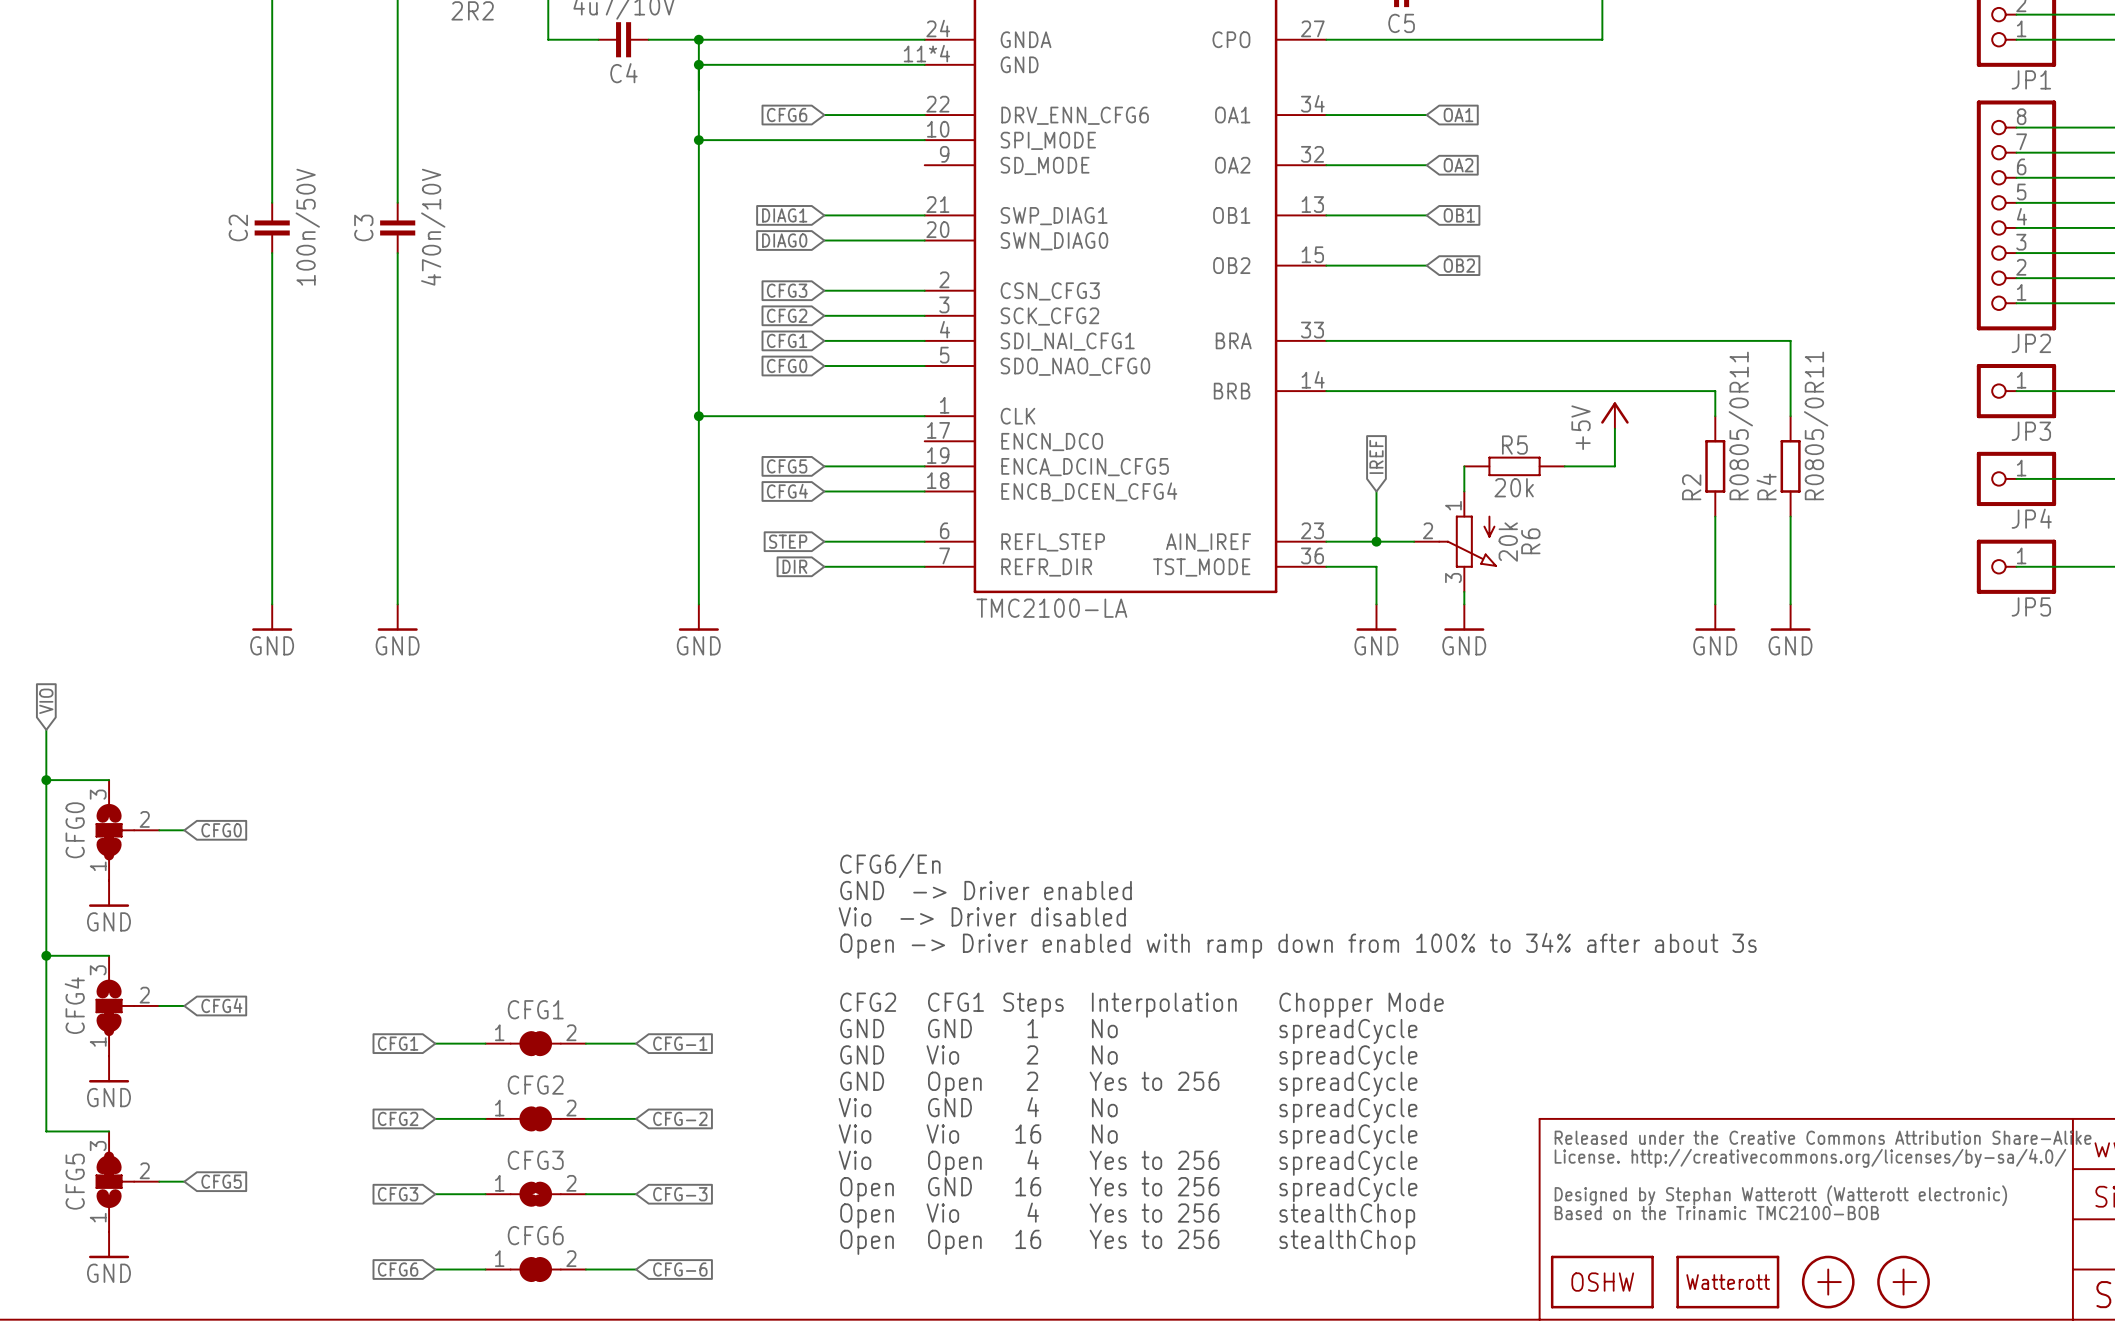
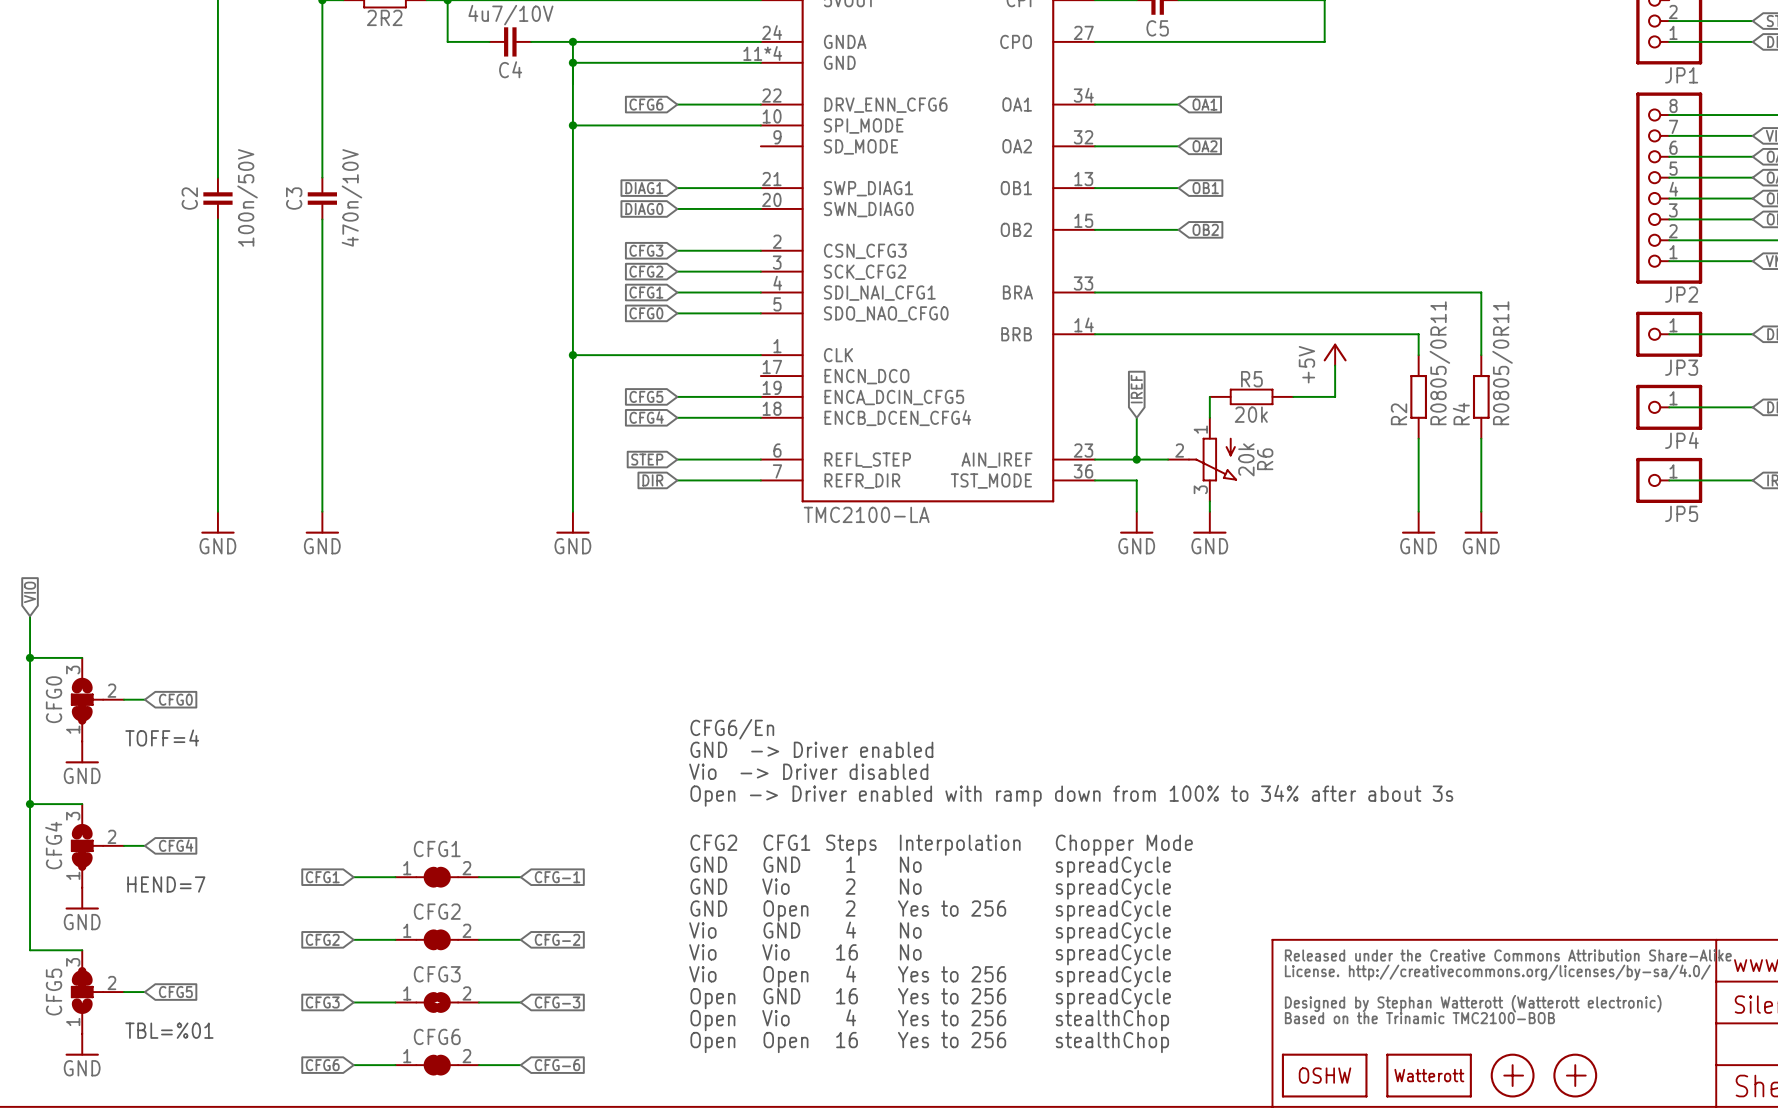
text: none -> TOFF=4 (162, 737)
text: none -> HEND=7 (166, 884)
text: none -> TBL=%01 (169, 1030)

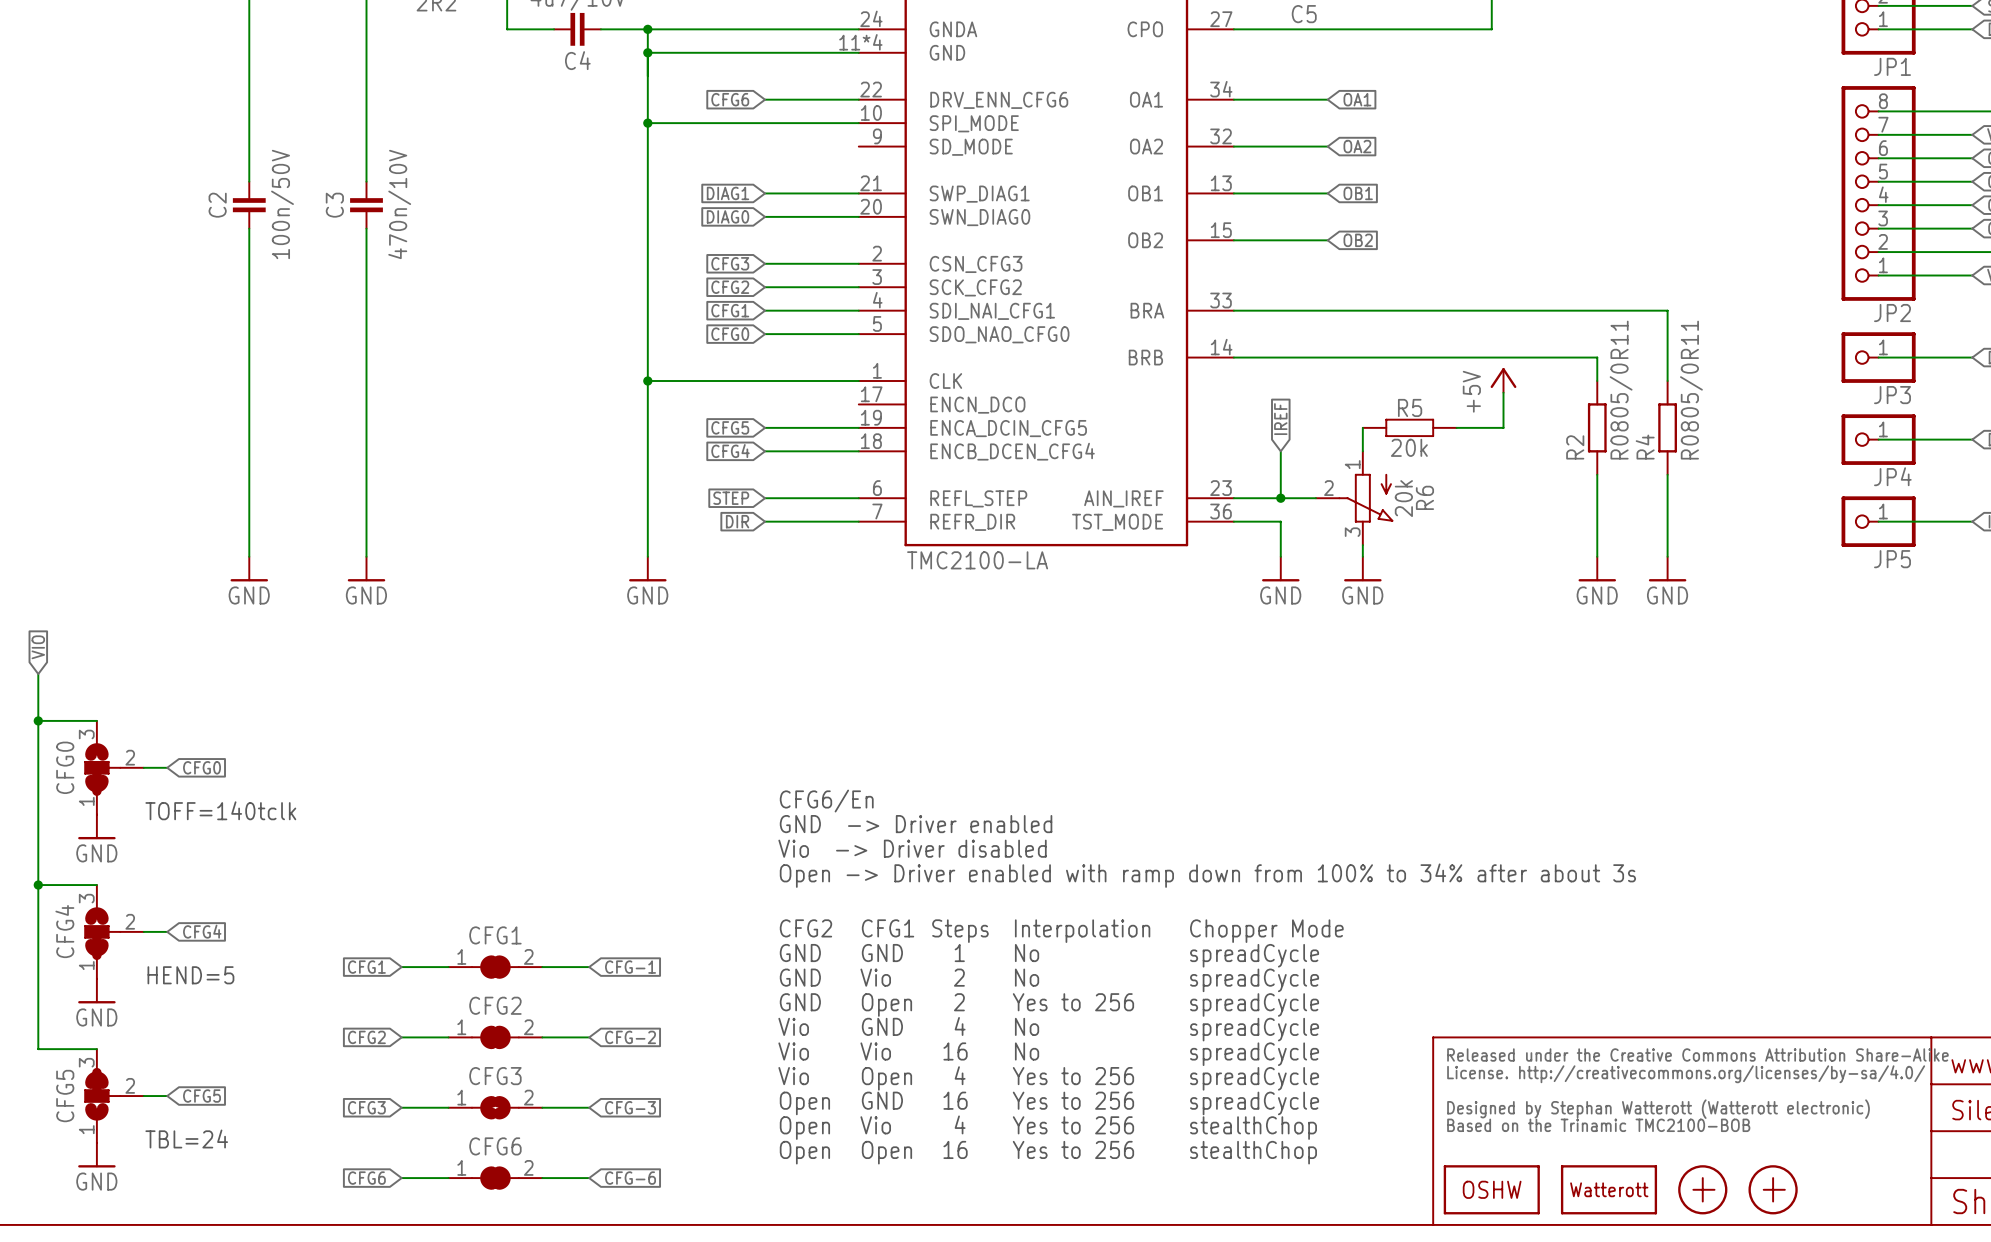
text: TOFF=4 (162, 737) -> TOFF=140tclk (220, 810)
text: HEND=7 (166, 884) -> HEND=5 (190, 975)
text: TBL=%01 (169, 1030) -> TBL=24 (186, 1139)

